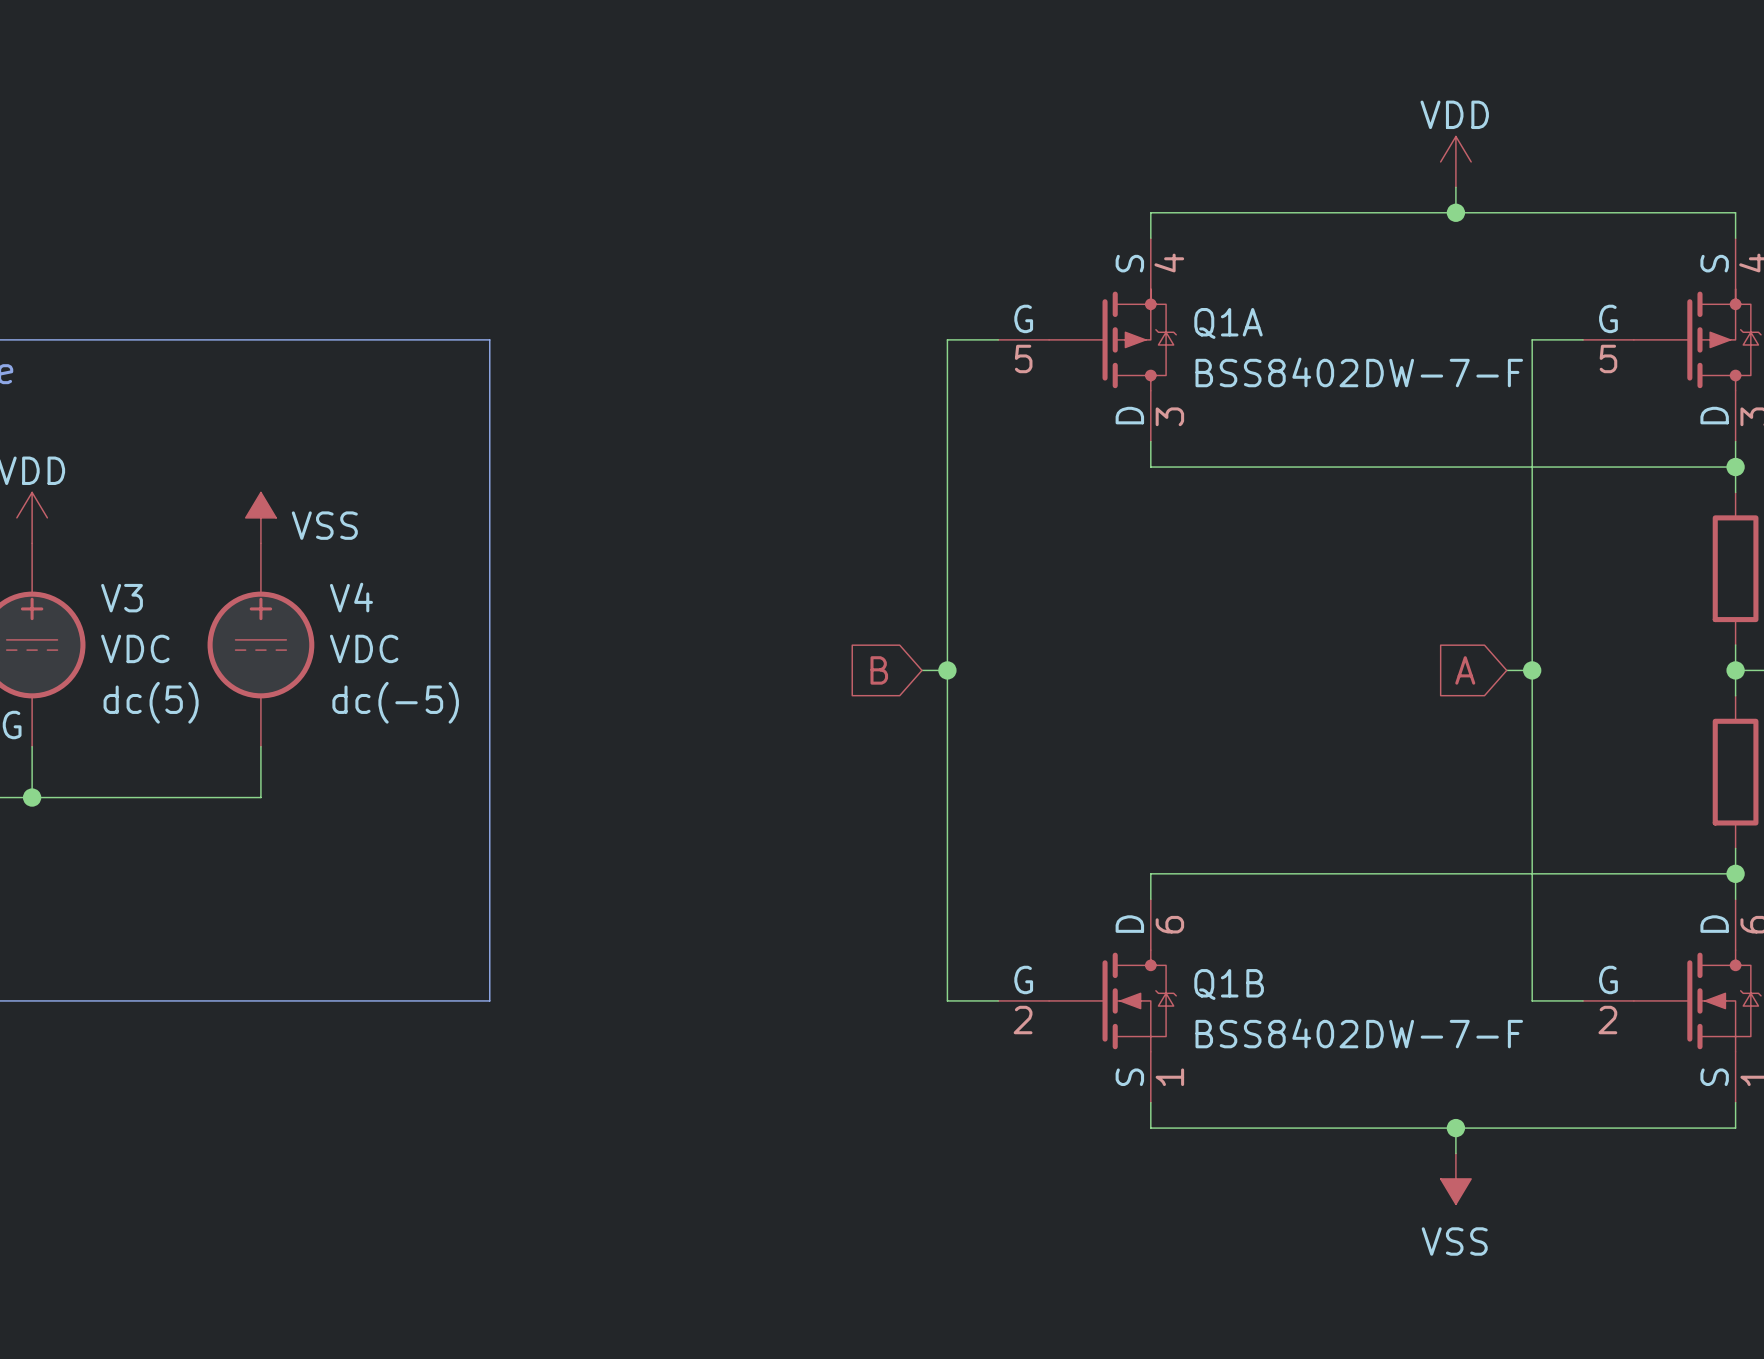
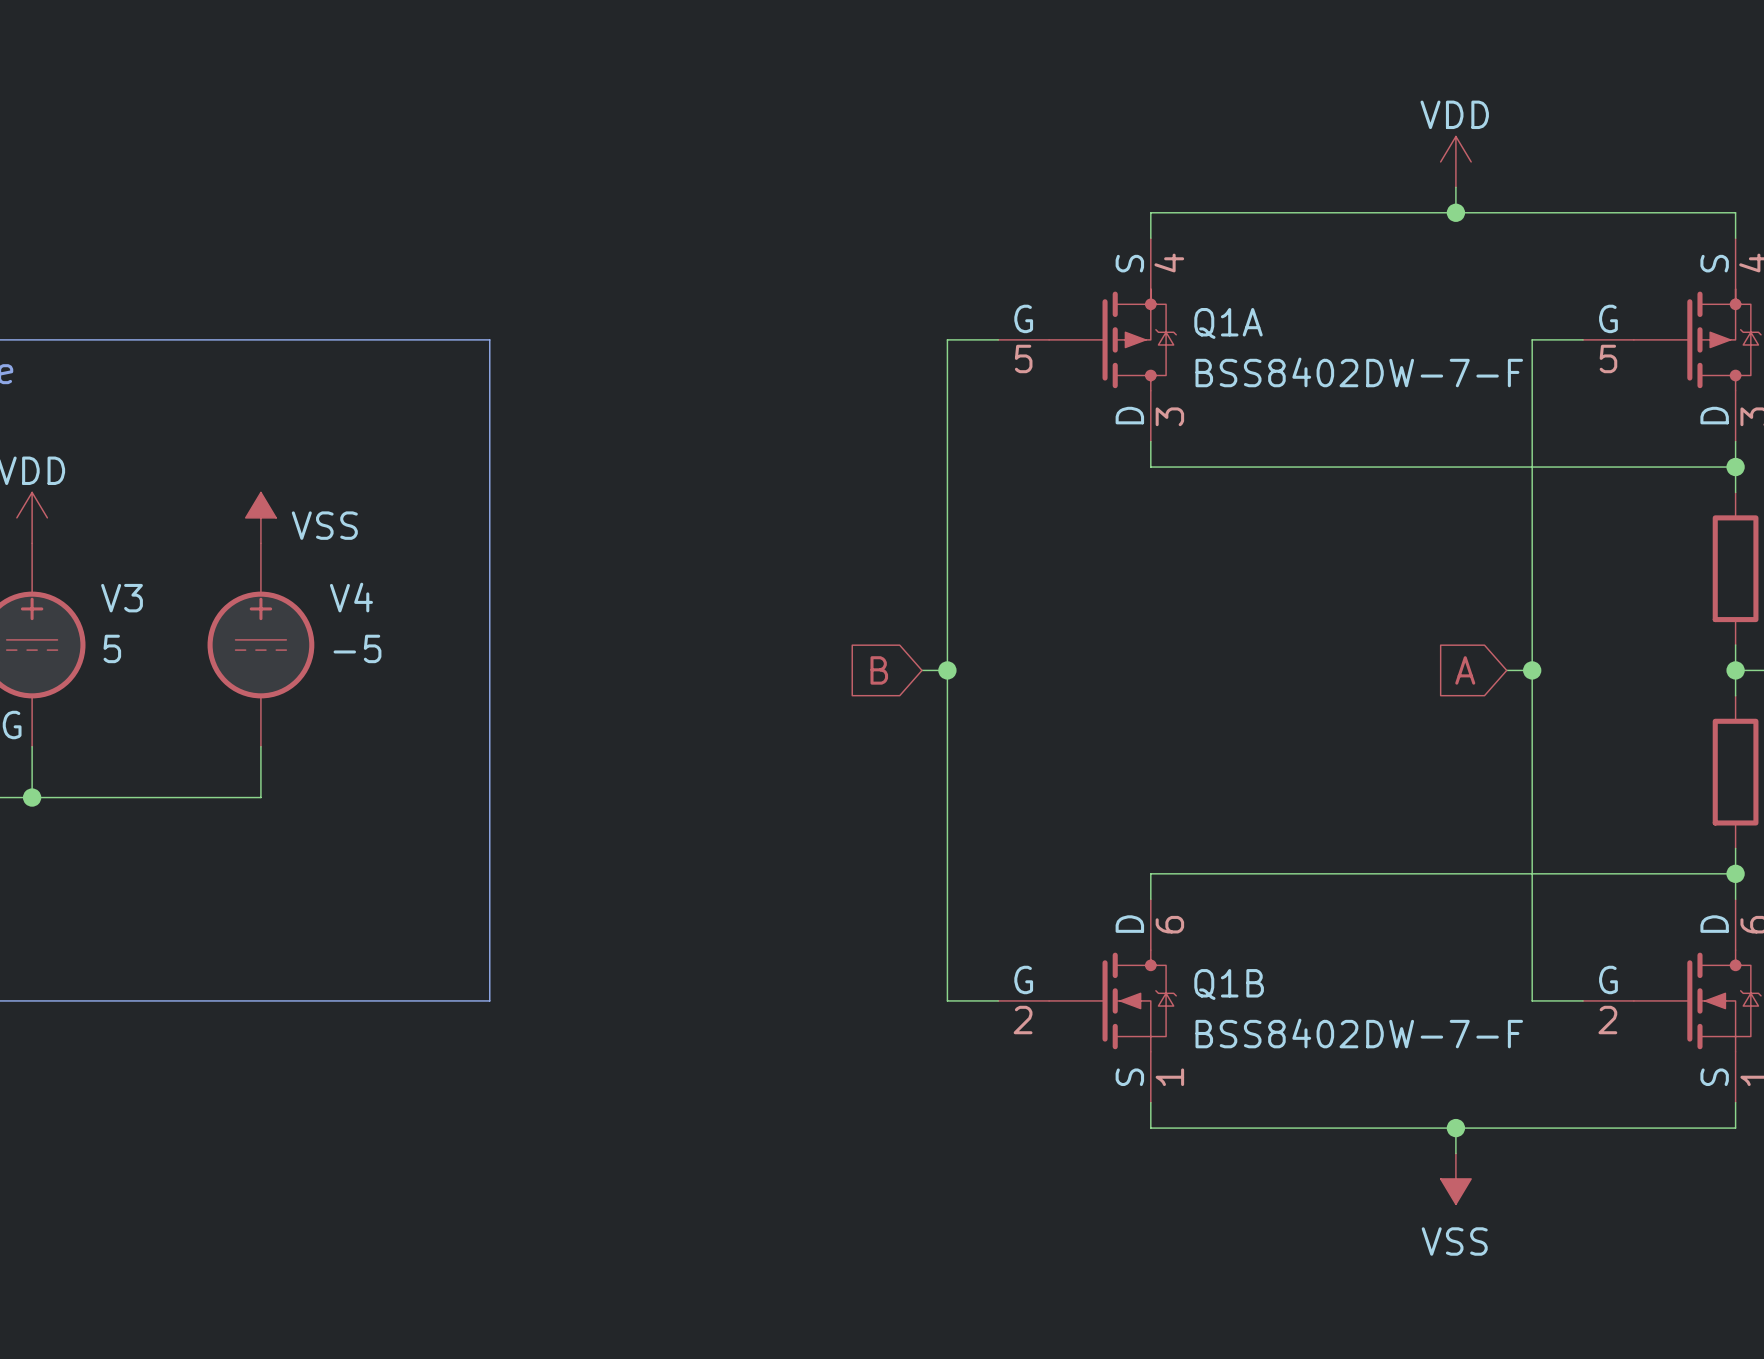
V3 value: VDC (135, 648) -> 5 (112, 648)
V4 value: VDC (364, 648) -> -5 (357, 648)
V3 text: dc(5) (151, 702) -> none
V4 text: dc(-5) (395, 702) -> none

